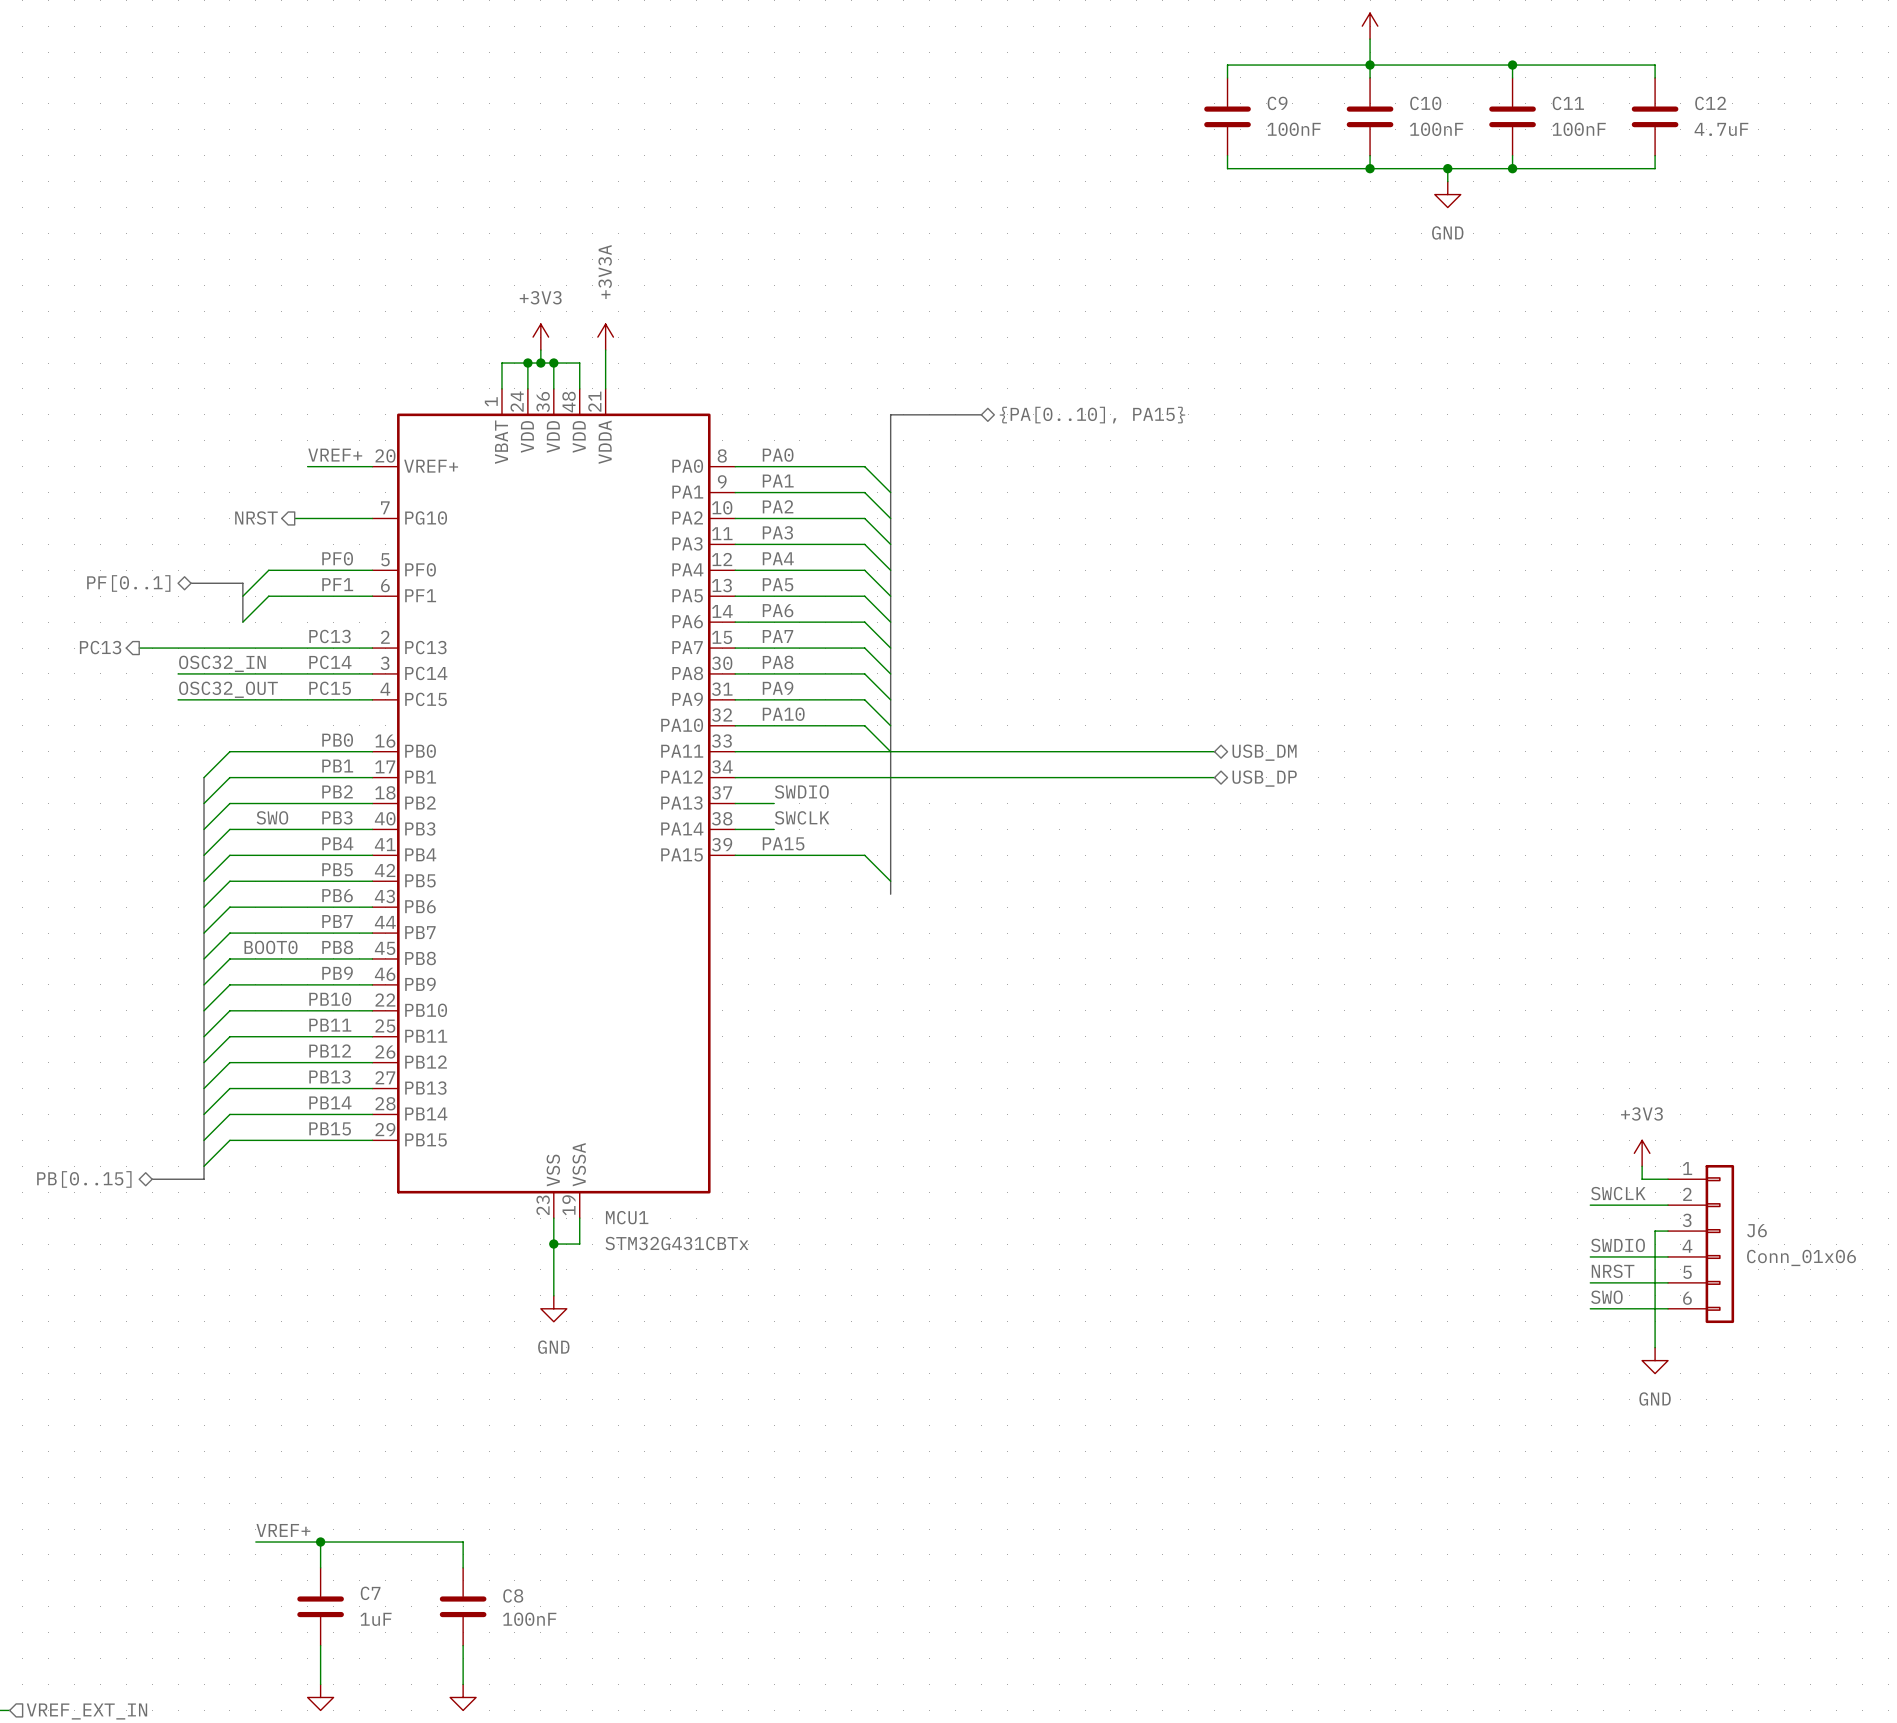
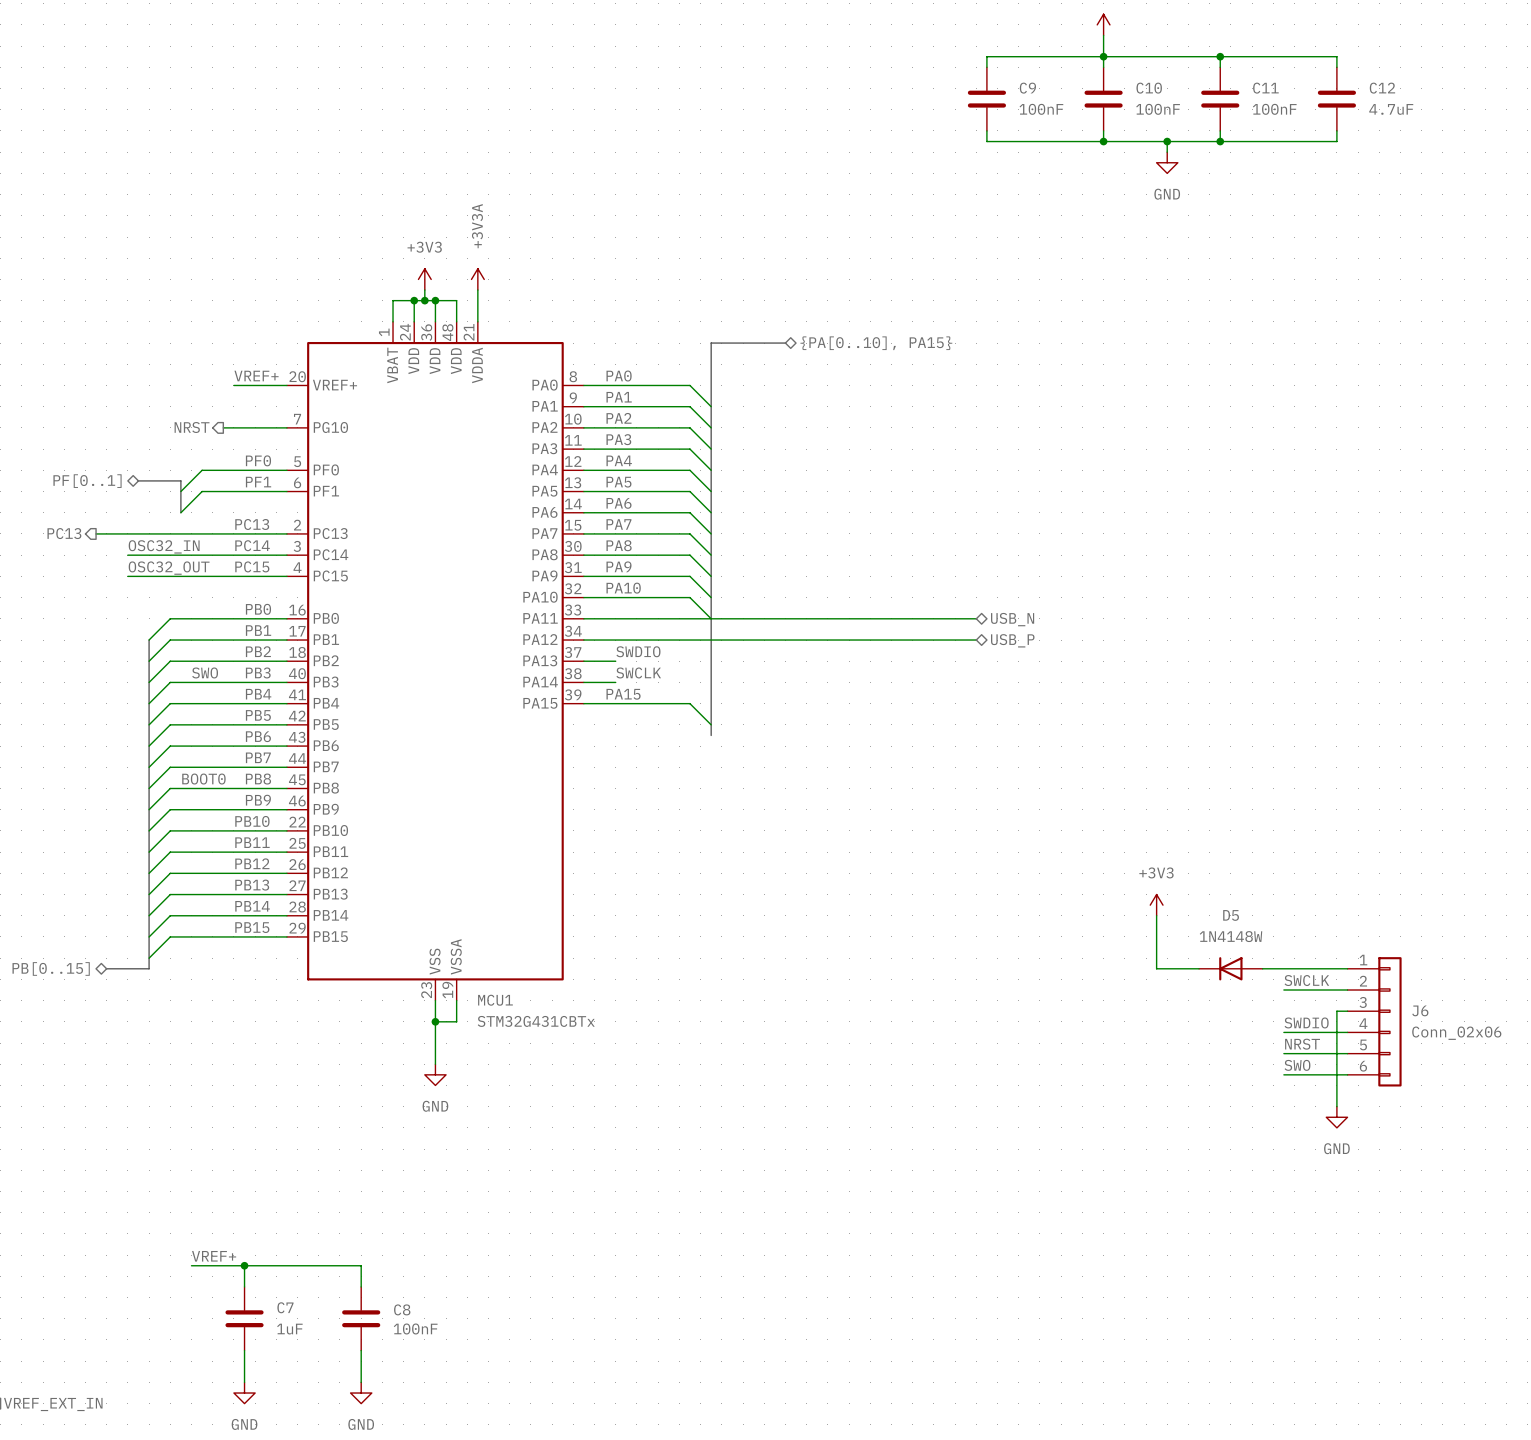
hierarchical label: USB_DM (1264, 752) -> USB_N (1012, 619)
hierarchical label: USB_DP (1264, 778) -> USB_P (1012, 640)
wire: none -> (1156, 915) (1156, 968) (1199, 968)
power symbol position: +3V3 (1642, 1153) -> +3V3 (1156, 905)
wire: (1642, 1166) (1642, 1179) -> (1262, 968) (1326, 968)
D5: none -> 1N4148W (1230, 968)
J6 value: Conn_01x06 (1801, 1257) -> Conn_02x06 (1456, 1033)

